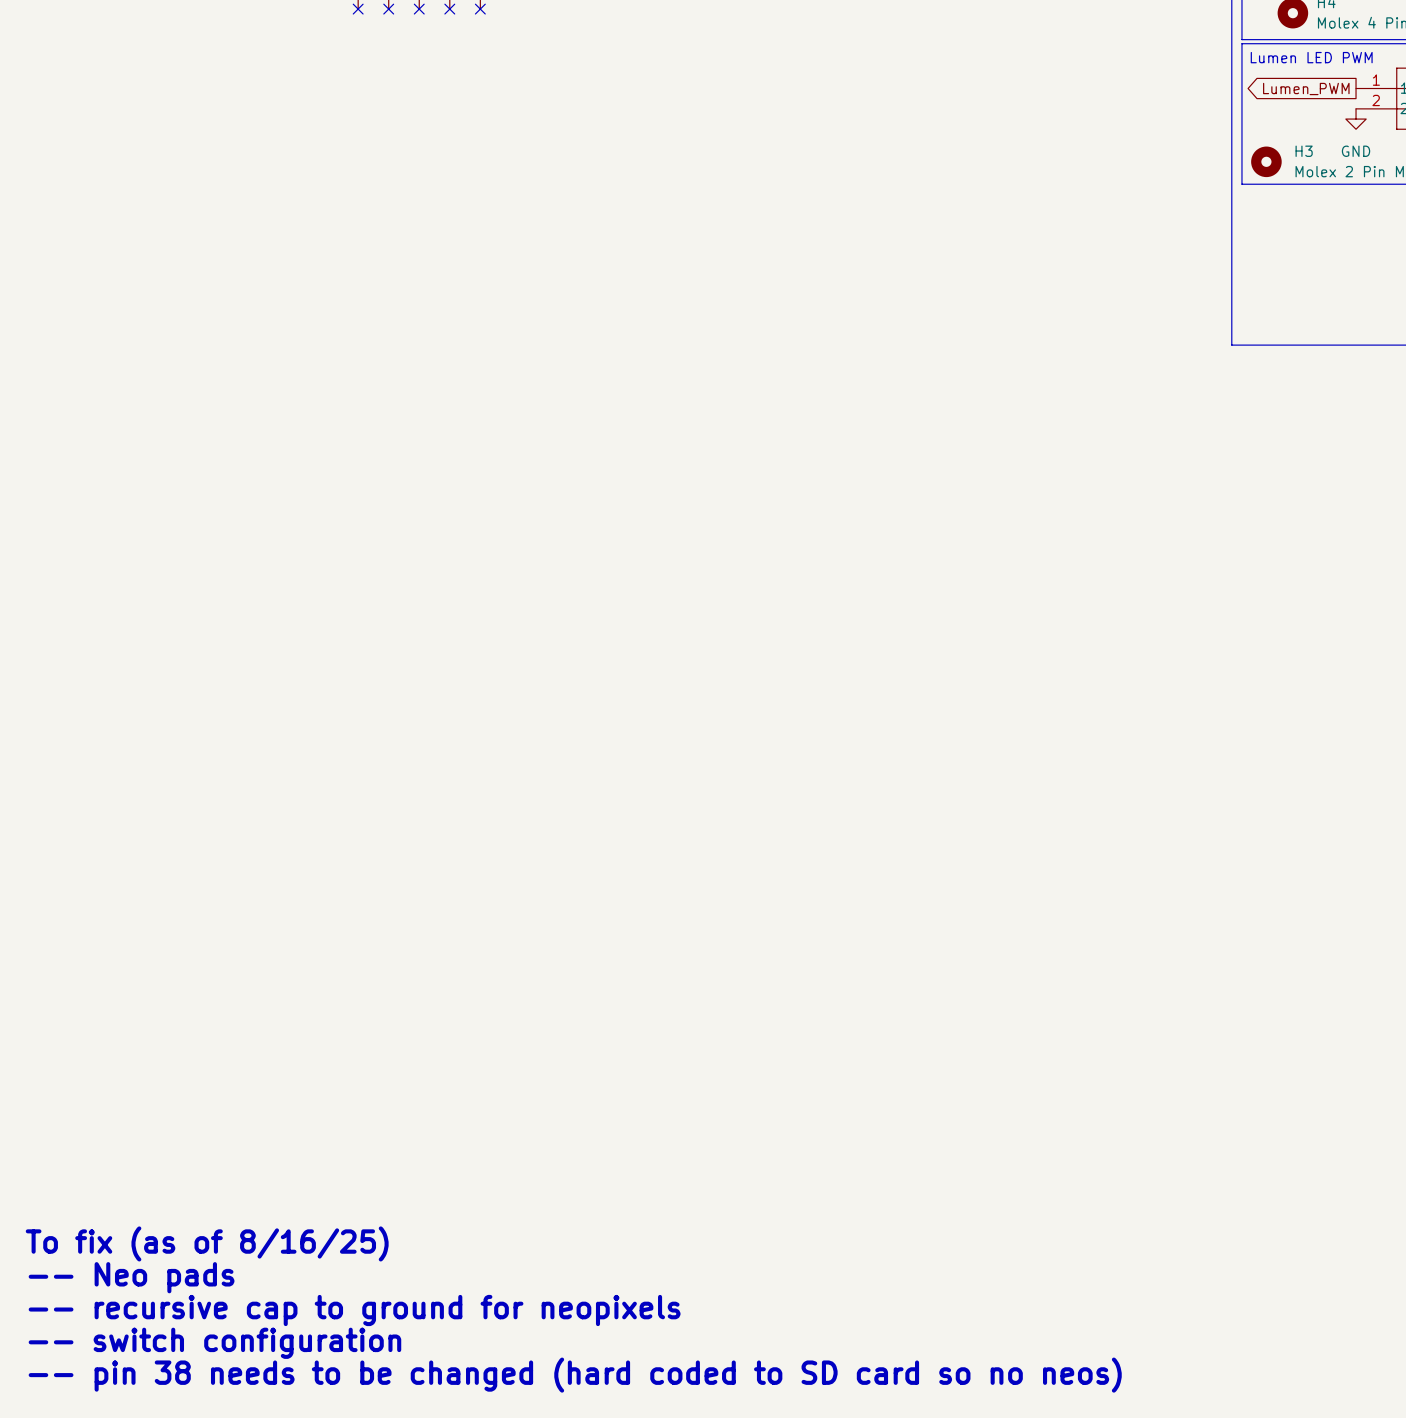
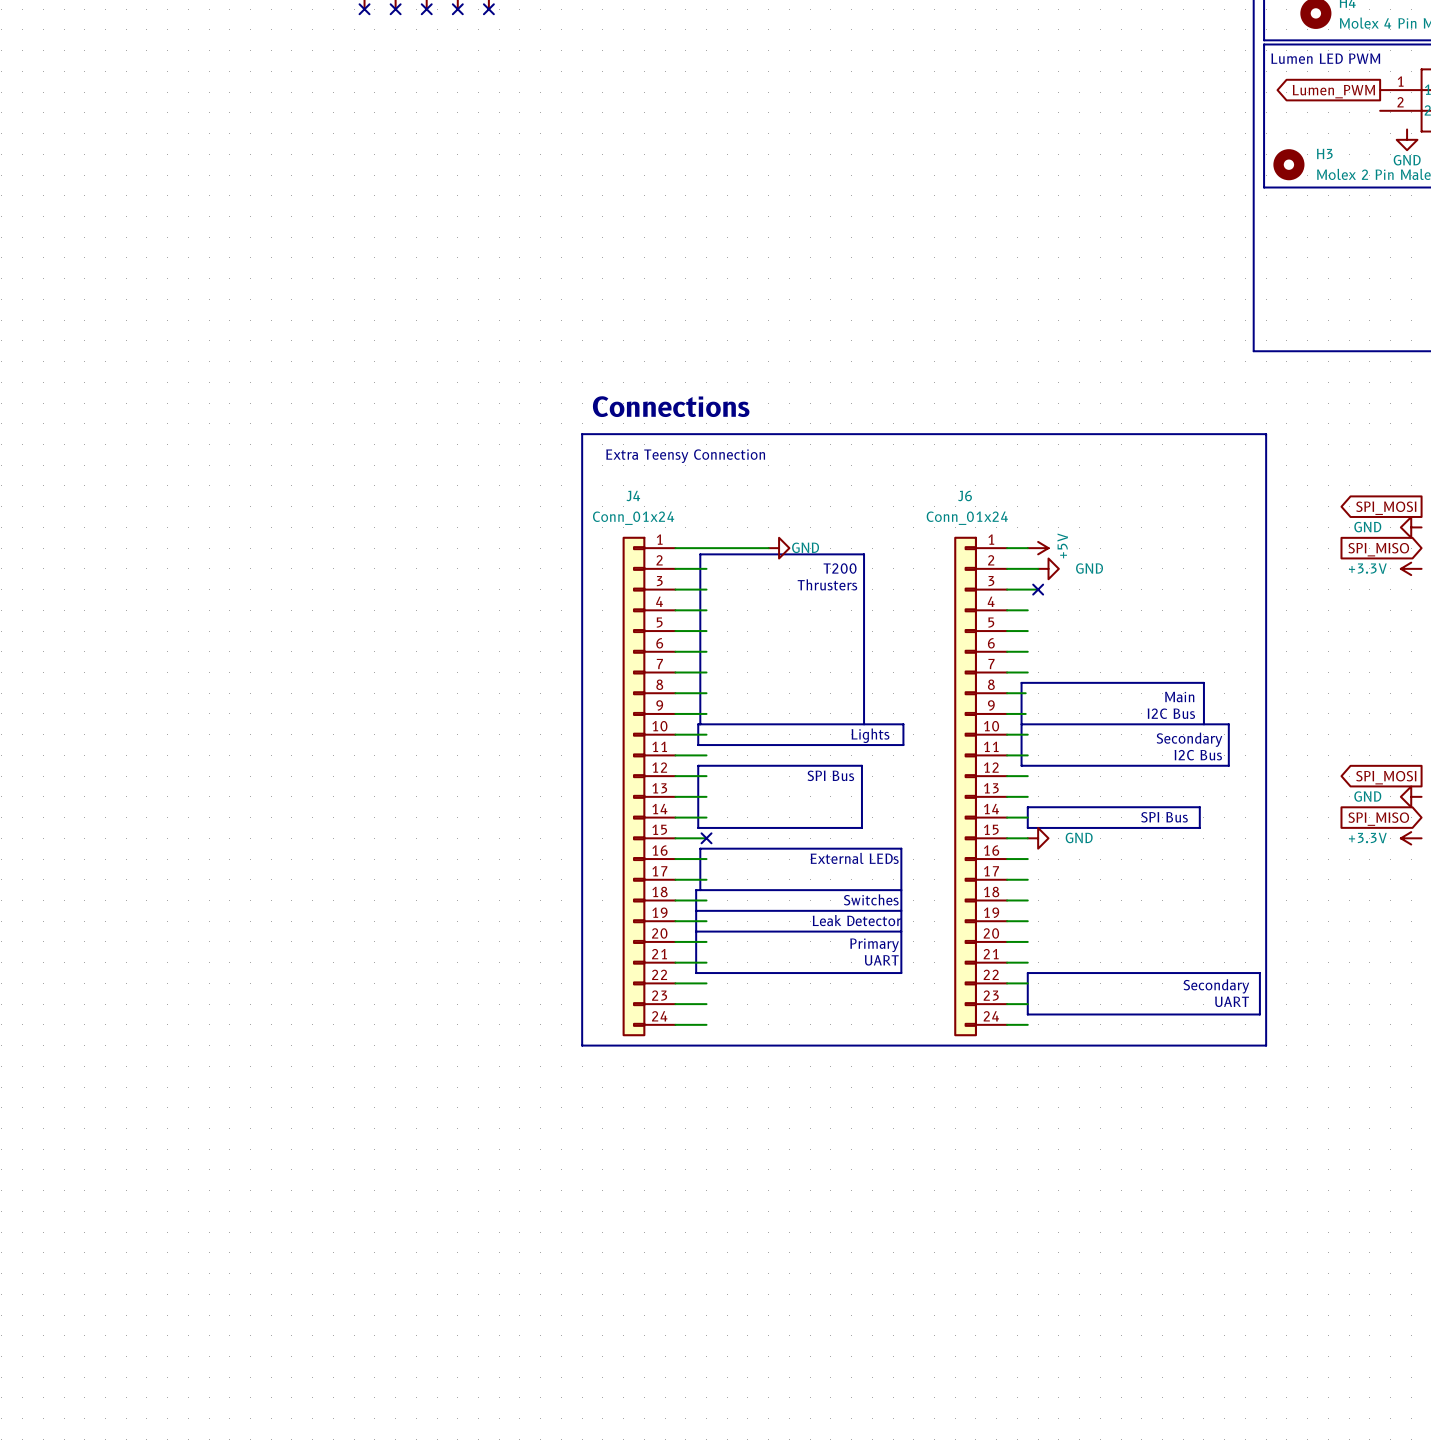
power symbol position: GND (1356, 119) -> GND (1407, 139)
power symbol text position: GND (1356, 151) -> GND (1407, 160)
text: none -> Connections (671, 406)
line: none -> (582, 434) (1266, 434) (1266, 1045) (582, 1045) (582, 434)
text: none -> Extra Teensy Connection (685, 456)
global label: none -> SPI_MOSI (1386, 508)
power symbol: none -> GND (1411, 527)
wire: none -> (675, 548) (768, 548)
power symbol: none -> GND (779, 548)
wire: none -> (1007, 548) (1027, 548)
power symbol: none -> +5V (1038, 548)
global label: none -> SPI_MISO (1378, 549)
wire: none -> (675, 568) (706, 568)
text: none -> T200 (840, 568)
wire: none -> (1007, 568) (1038, 568)
power symbol: none -> GND (1048, 568)
power symbol: none -> +3.3V (1411, 568)
text: none -> Thrusters (827, 584)
wire: none -> (675, 589) (706, 589)
wire: none -> (1007, 589) (1038, 589)
no-connect mark: none -> (1038, 589)
wire: none -> (675, 610) (706, 610)
wire: none -> (1007, 610) (1027, 610)
wire: none -> (675, 631) (706, 631)
wire: none -> (1007, 631) (1027, 631)
wire: none -> (675, 651) (706, 651)
wire: none -> (1007, 651) (1027, 651)
wire: none -> (675, 672) (706, 672)
wire: none -> (1007, 672) (1027, 672)
wire: none -> (675, 693) (706, 693)
wire: none -> (1007, 693) (1025, 693)
text: none -> Main (1179, 697)
wire: none -> (675, 713) (706, 713)
wire: none -> (1007, 713) (1025, 713)
text: none -> I2C Bus (1171, 713)
line: none -> (698, 724) (903, 724) (903, 745) (698, 745) (698, 724)
line: none -> (700, 724) (700, 554) (864, 554) (864, 724)
line: none -> (1021, 724) (1228, 724) (1228, 765) (1021, 765) (1021, 682) (1203, 682) (1203, 724)
wire: none -> (675, 734) (706, 734)
wire: none -> (1007, 734) (1027, 734)
text: none -> Lights (870, 735)
text: none -> Secondary (1189, 739)
text: none -> I2C Bus (1198, 755)
wire: none -> (675, 755) (706, 755)
wire: none -> (1007, 755) (1027, 755)
line: none -> (698, 765) (698, 827) (861, 827) (861, 765) (698, 765)
wire: none -> (675, 776) (706, 776)
text: none -> SPI Bus (830, 775)
wire: none -> (1007, 776) (1027, 776)
global label: none -> SPI_MOSI (1386, 777)
J4: none -> Conn_01x24 (649, 786)
J6: none -> Conn_01x24 (980, 786)
wire: none -> (675, 796) (706, 796)
wire: none -> (1007, 796) (1027, 796)
power symbol: none -> GND (1411, 796)
line: none -> (1027, 807) (1027, 827) (1199, 827) (1199, 807) (1027, 807)
text: none -> SPI Bus (1164, 817)
wire: none -> (675, 817) (706, 817)
wire: none -> (1007, 817) (1027, 817)
global label: none -> SPI_MISO (1378, 819)
wire: none -> (675, 838) (706, 838)
no-connect mark: none -> (706, 838)
wire: none -> (1007, 838) (1027, 838)
power symbol: none -> GND (1038, 838)
power symbol: none -> +3.3V (1411, 838)
text: none -> External LEDs (854, 858)
wire: none -> (675, 859) (706, 859)
wire: none -> (1007, 859) (1027, 859)
wire: none -> (675, 879) (706, 879)
wire: none -> (1007, 879) (1027, 879)
line: none -> (700, 890) (700, 848) (901, 848) (901, 973) (696, 973) (696, 890) (901, 890)
wire: none -> (675, 900) (706, 900)
text: none -> Switches (871, 899)
wire: none -> (1007, 900) (1027, 900)
line: none -> (696, 910) (901, 910)
text: none -> Leak Detector (857, 920)
wire: none -> (675, 921) (706, 921)
wire: none -> (1007, 921) (1027, 921)
line: none -> (696, 931) (901, 931)
wire: none -> (675, 941) (706, 941)
wire: none -> (1007, 941) (1027, 941)
text: none -> Primary (874, 945)
text: none -> UART (881, 960)
wire: none -> (675, 962) (706, 962)
wire: none -> (1007, 962) (1027, 962)
line: none -> (1027, 973) (1259, 973) (1259, 1014) (1027, 1014) (1027, 973)
wire: none -> (675, 983) (706, 983)
wire: none -> (1007, 983) (1027, 983)
text: none -> Secondary (1216, 986)
text: none -> UART (1232, 1001)
wire: none -> (675, 1004) (706, 1004)
wire: none -> (1007, 1004) (1027, 1004)
wire: none -> (675, 1024) (706, 1024)
wire: none -> (1007, 1024) (1027, 1024)
text: To fix (as of 8/16/25) (207, 1243) -> none
text: -- Neo pads (131, 1277) -> none
text: -- recursive cap to ground for neopixels (354, 1310) -> none
text: -- switch configuration (214, 1343) -> none
text: -- pin 38 needs to be changed (hard coded to SD card so no neos) (575, 1375) -> none

